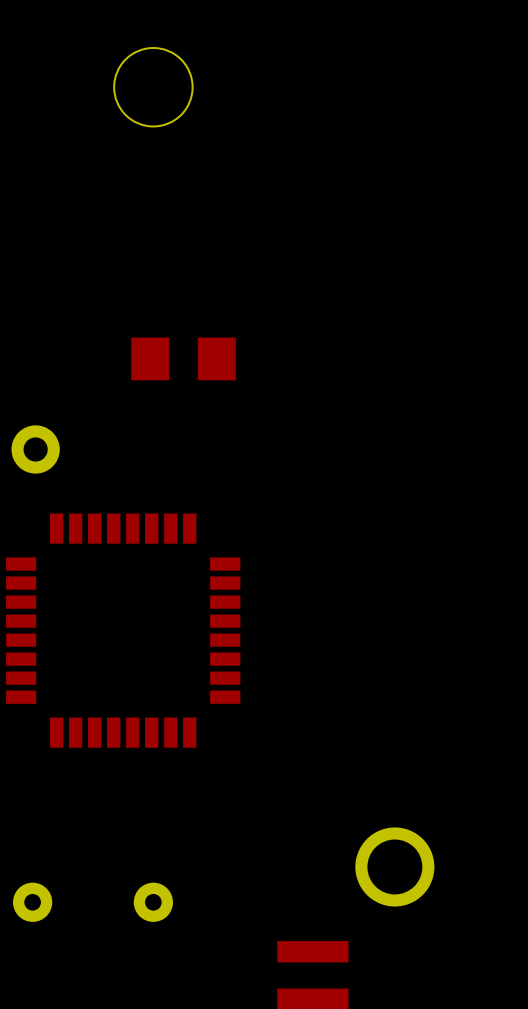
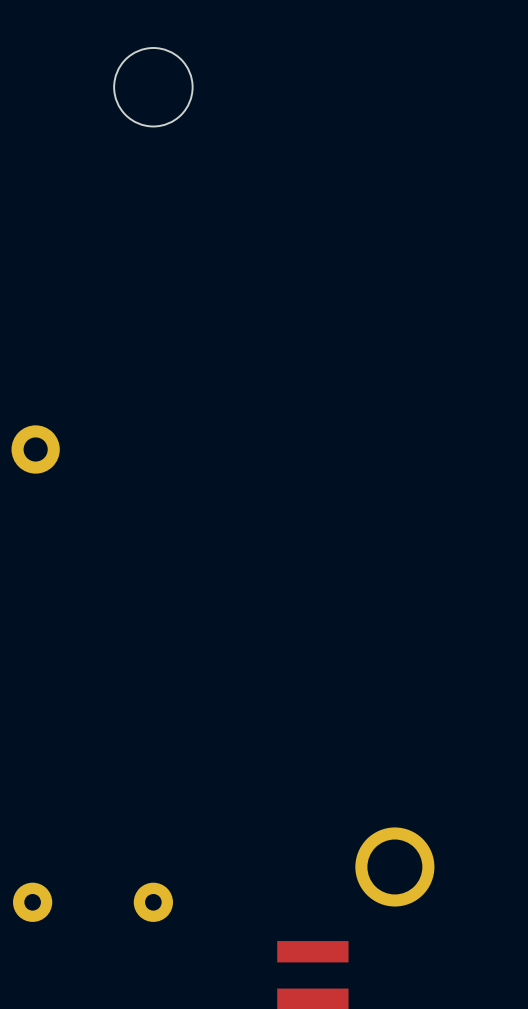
part: (183, 358) -> none
part: (123, 630) -> none

